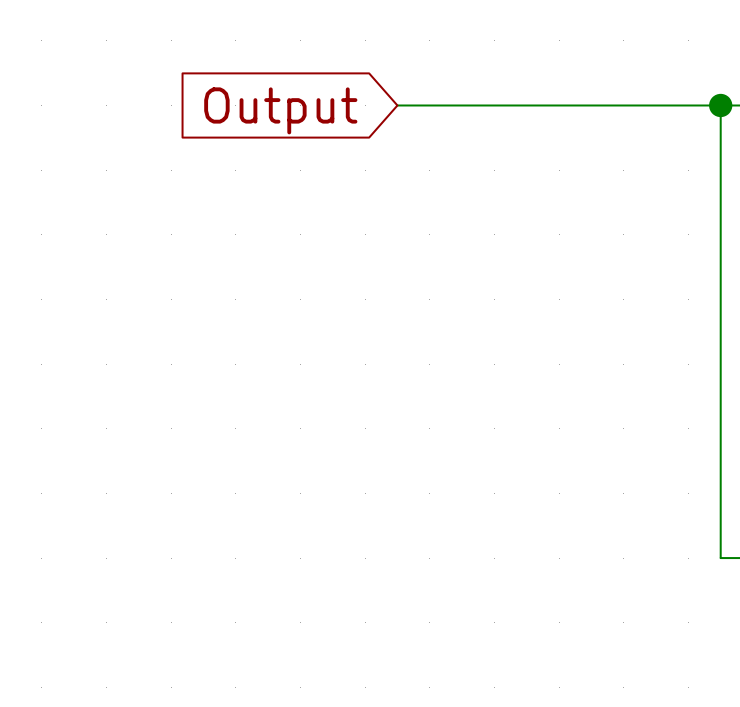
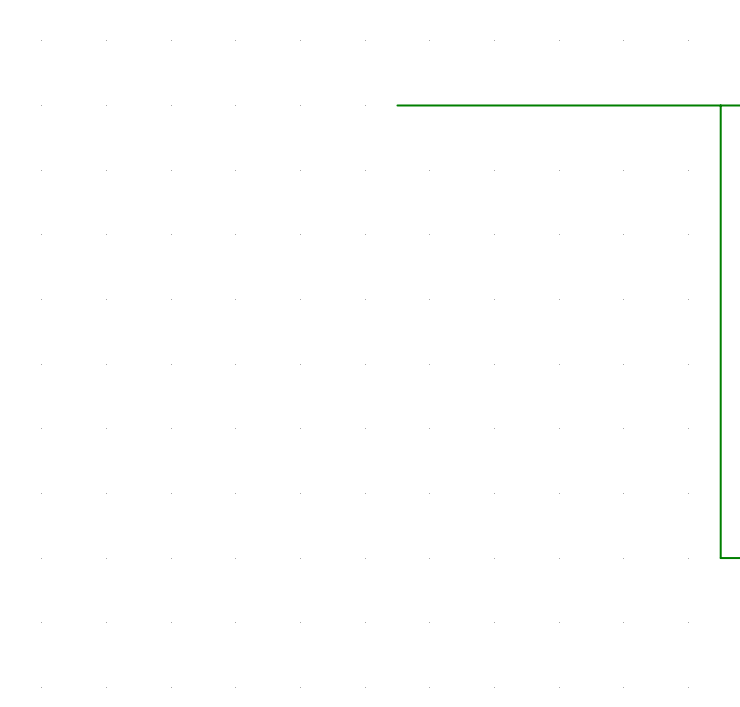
junction: (720, 105) -> none
global label: Output (280, 110) -> none

